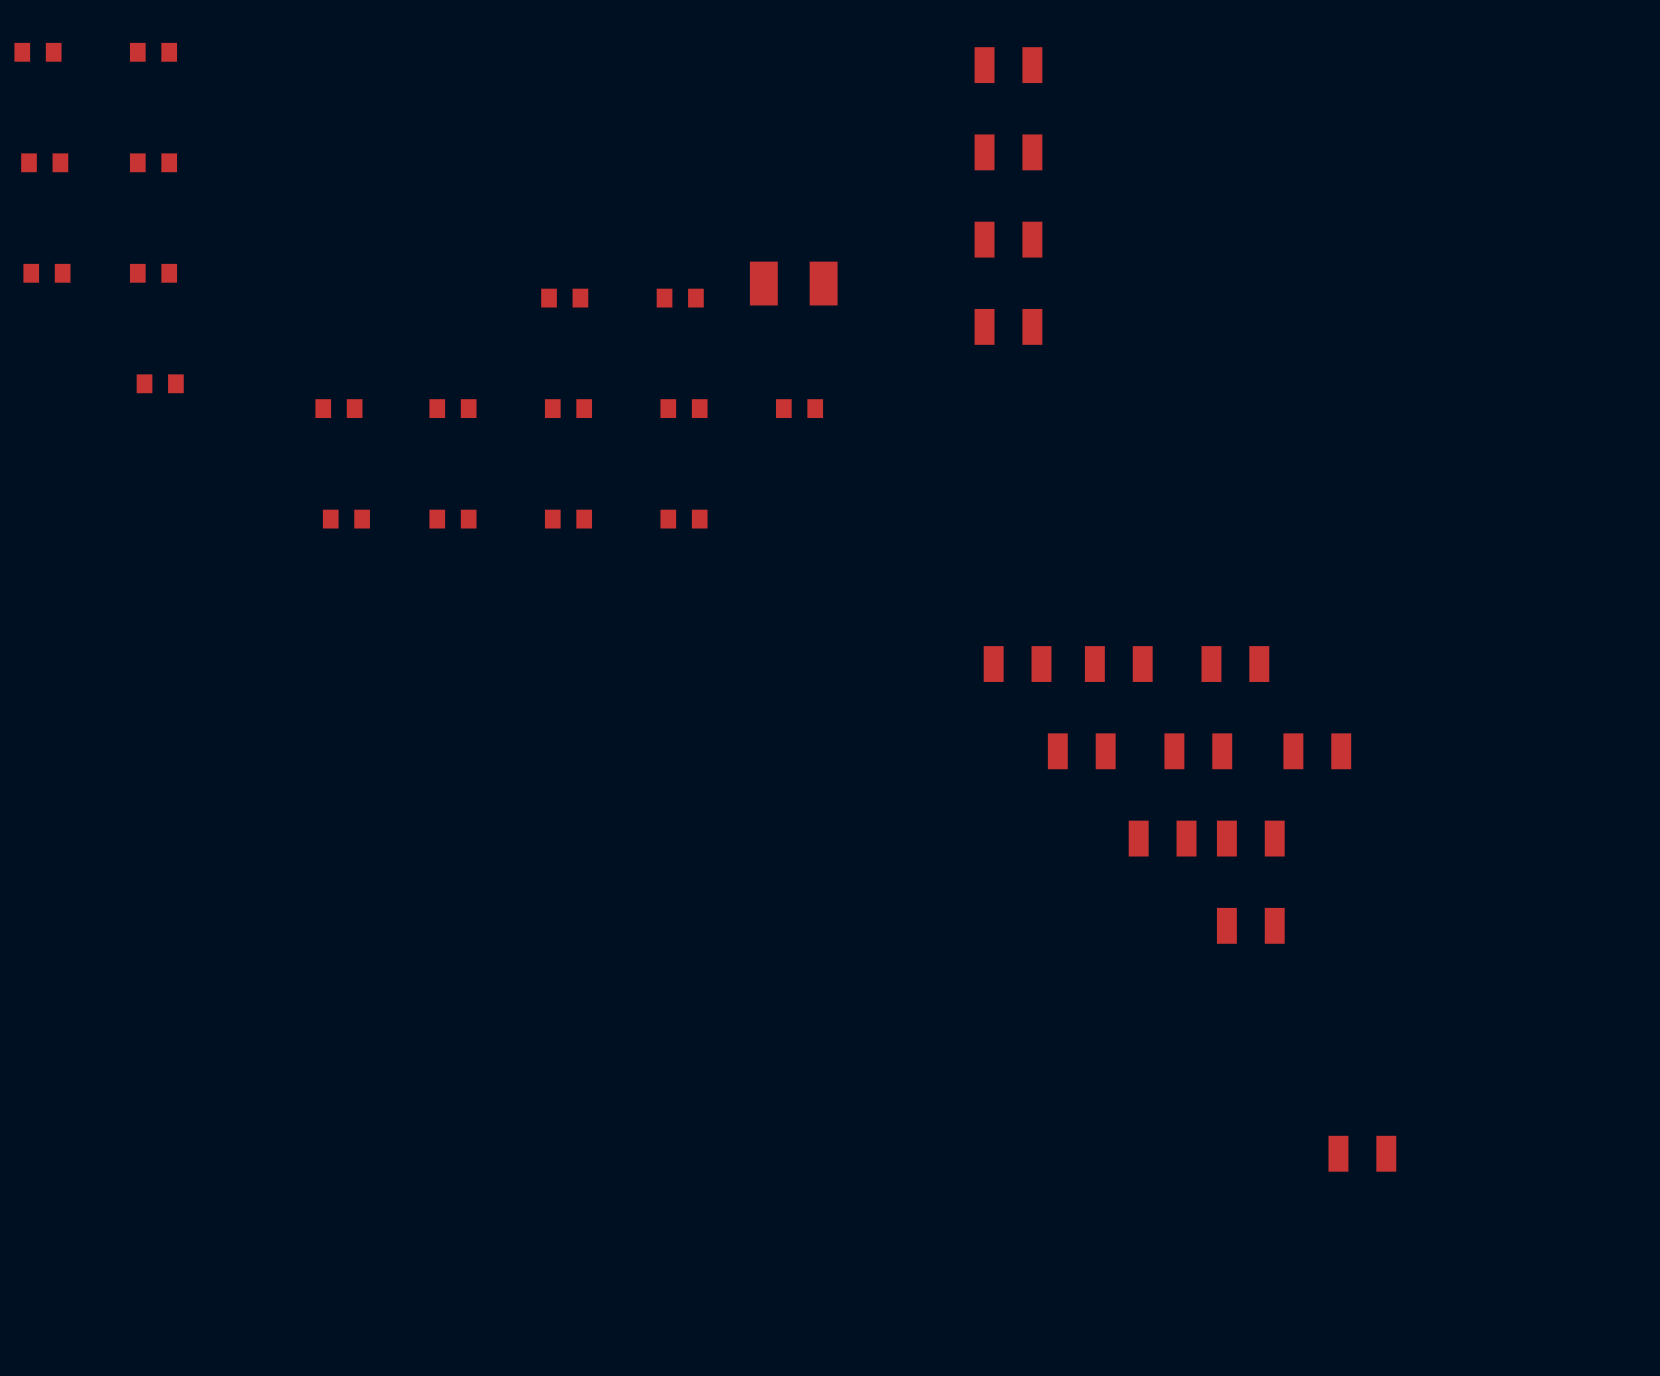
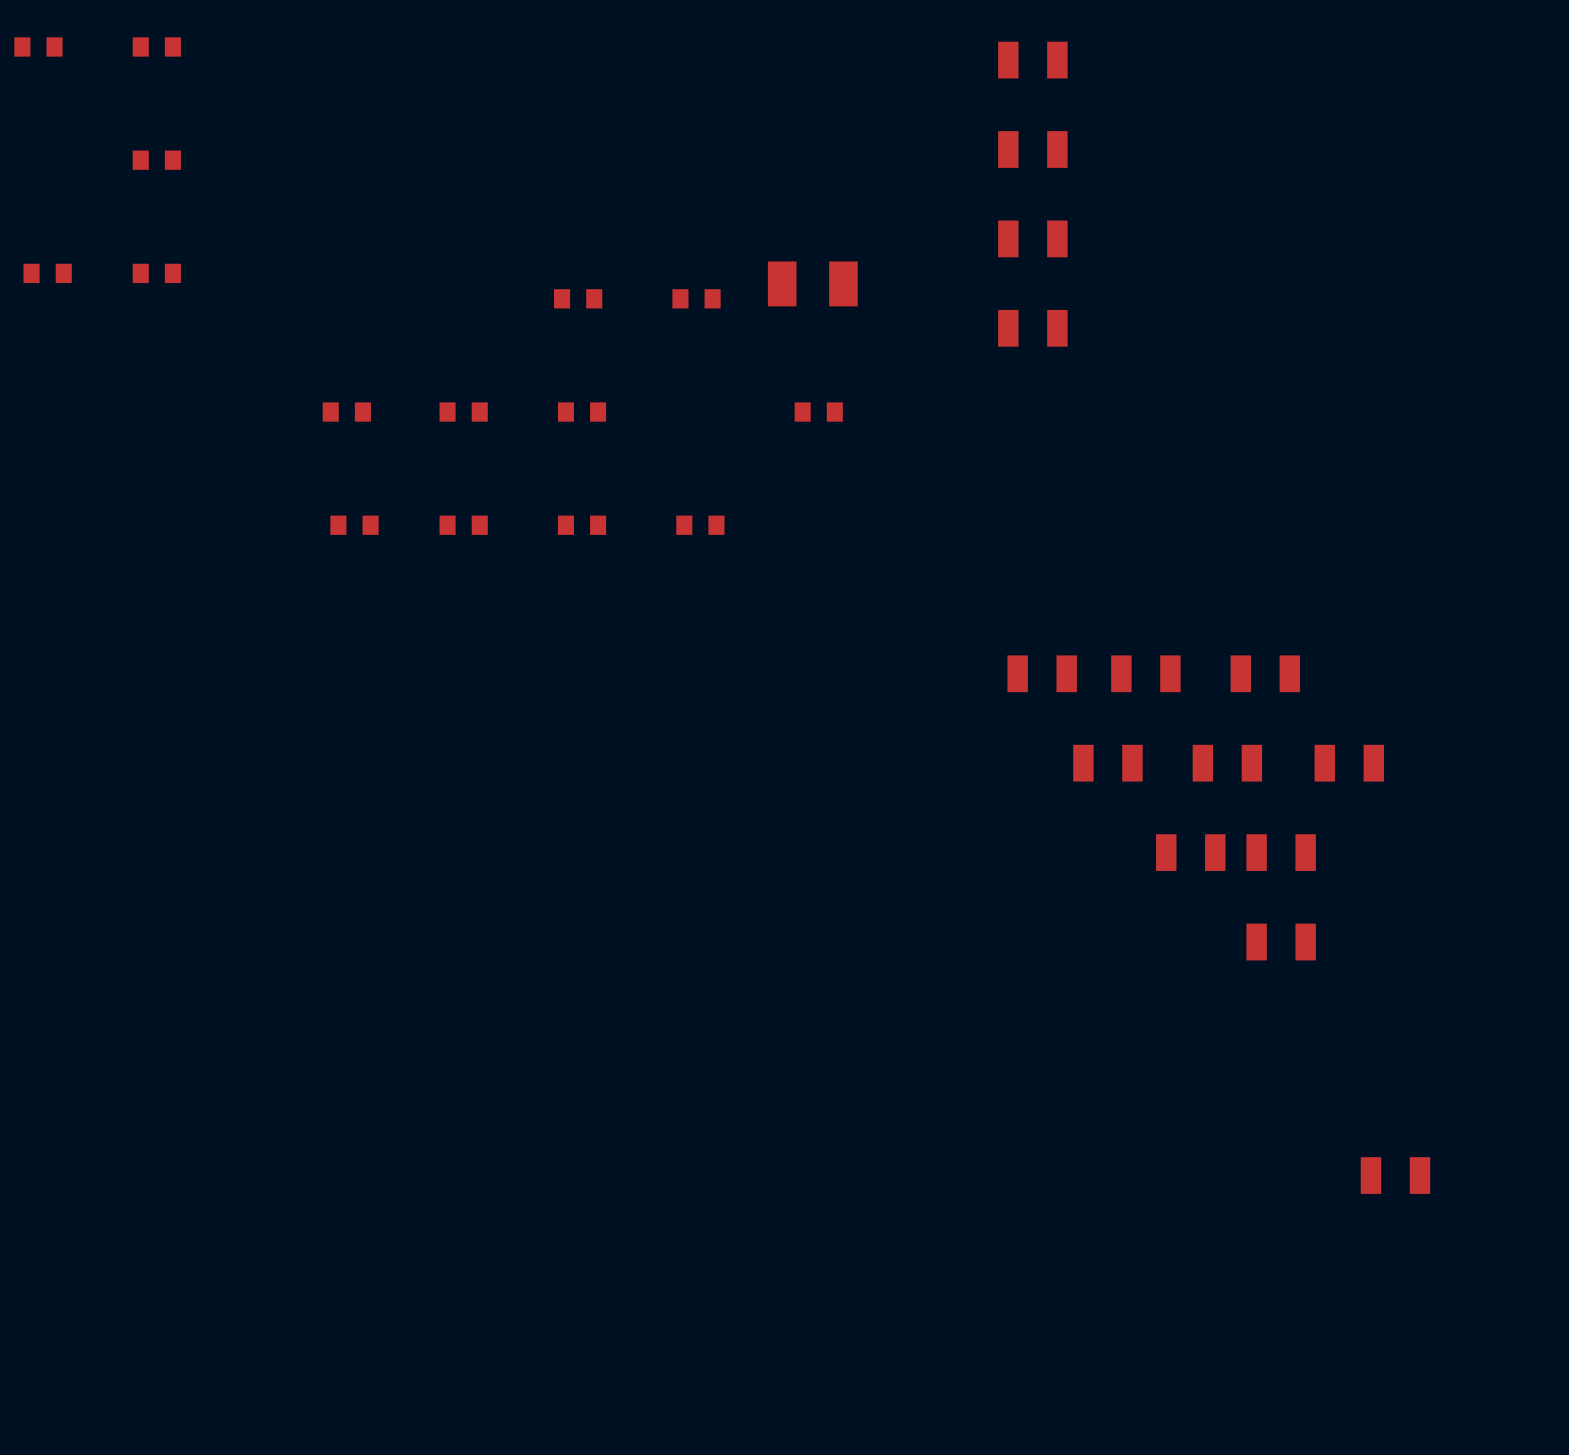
part: (44, 162) -> none
part: (160, 383) -> none
part: (684, 408) -> none

